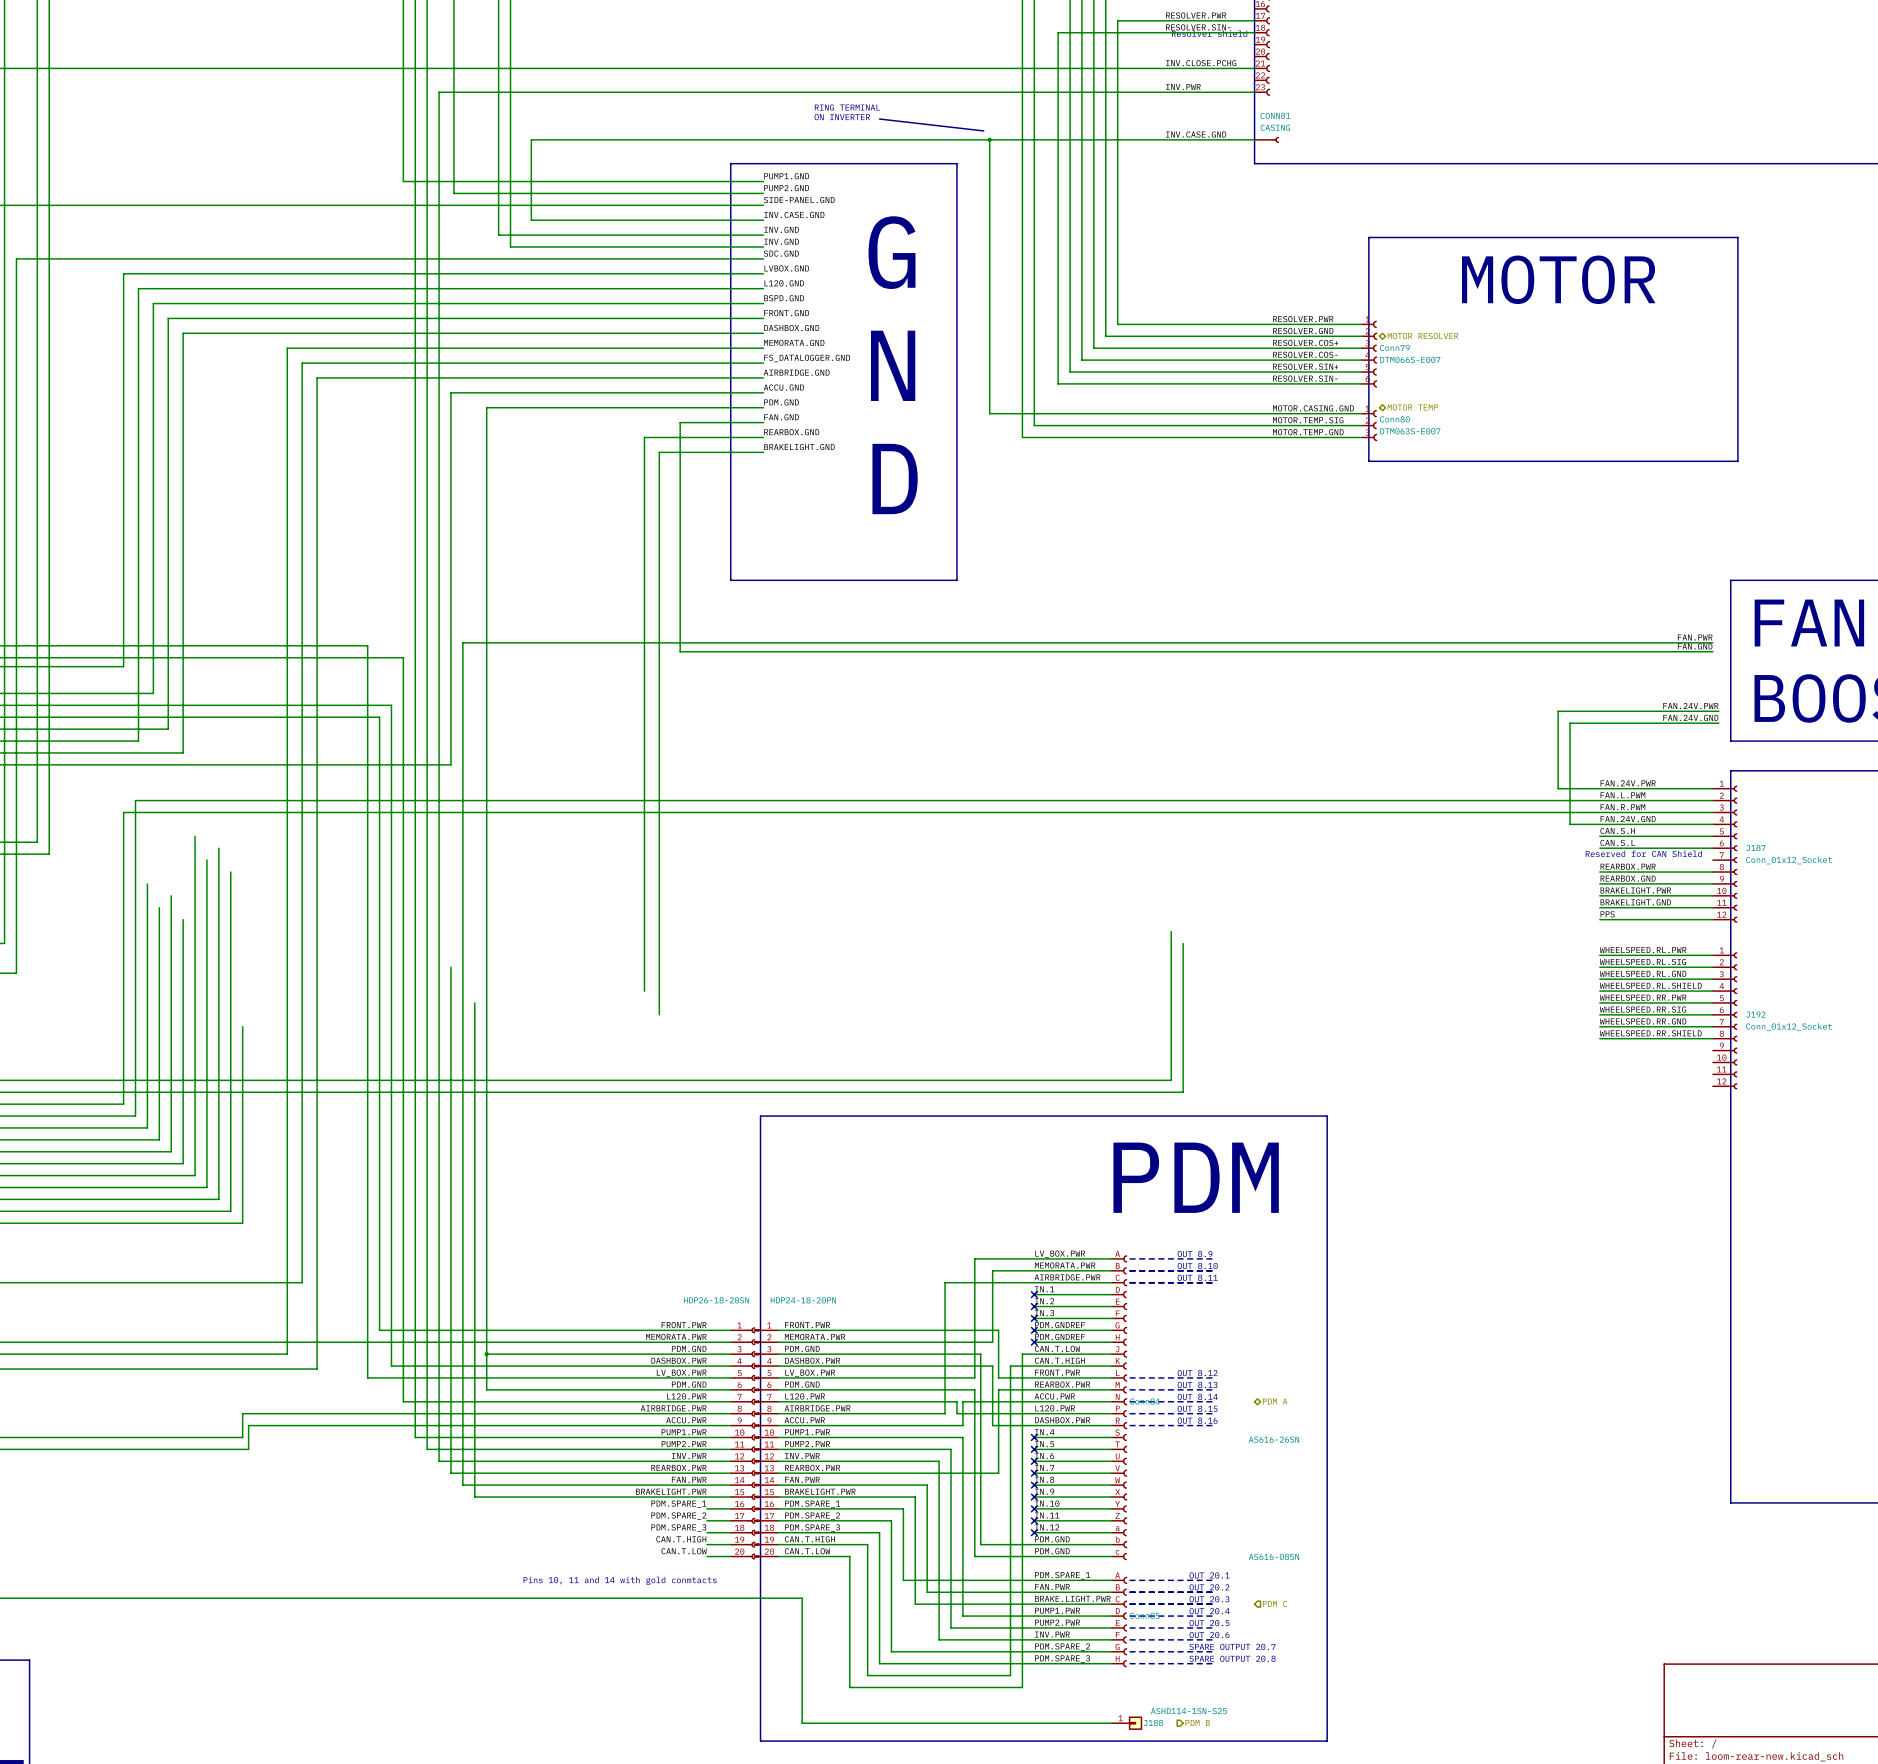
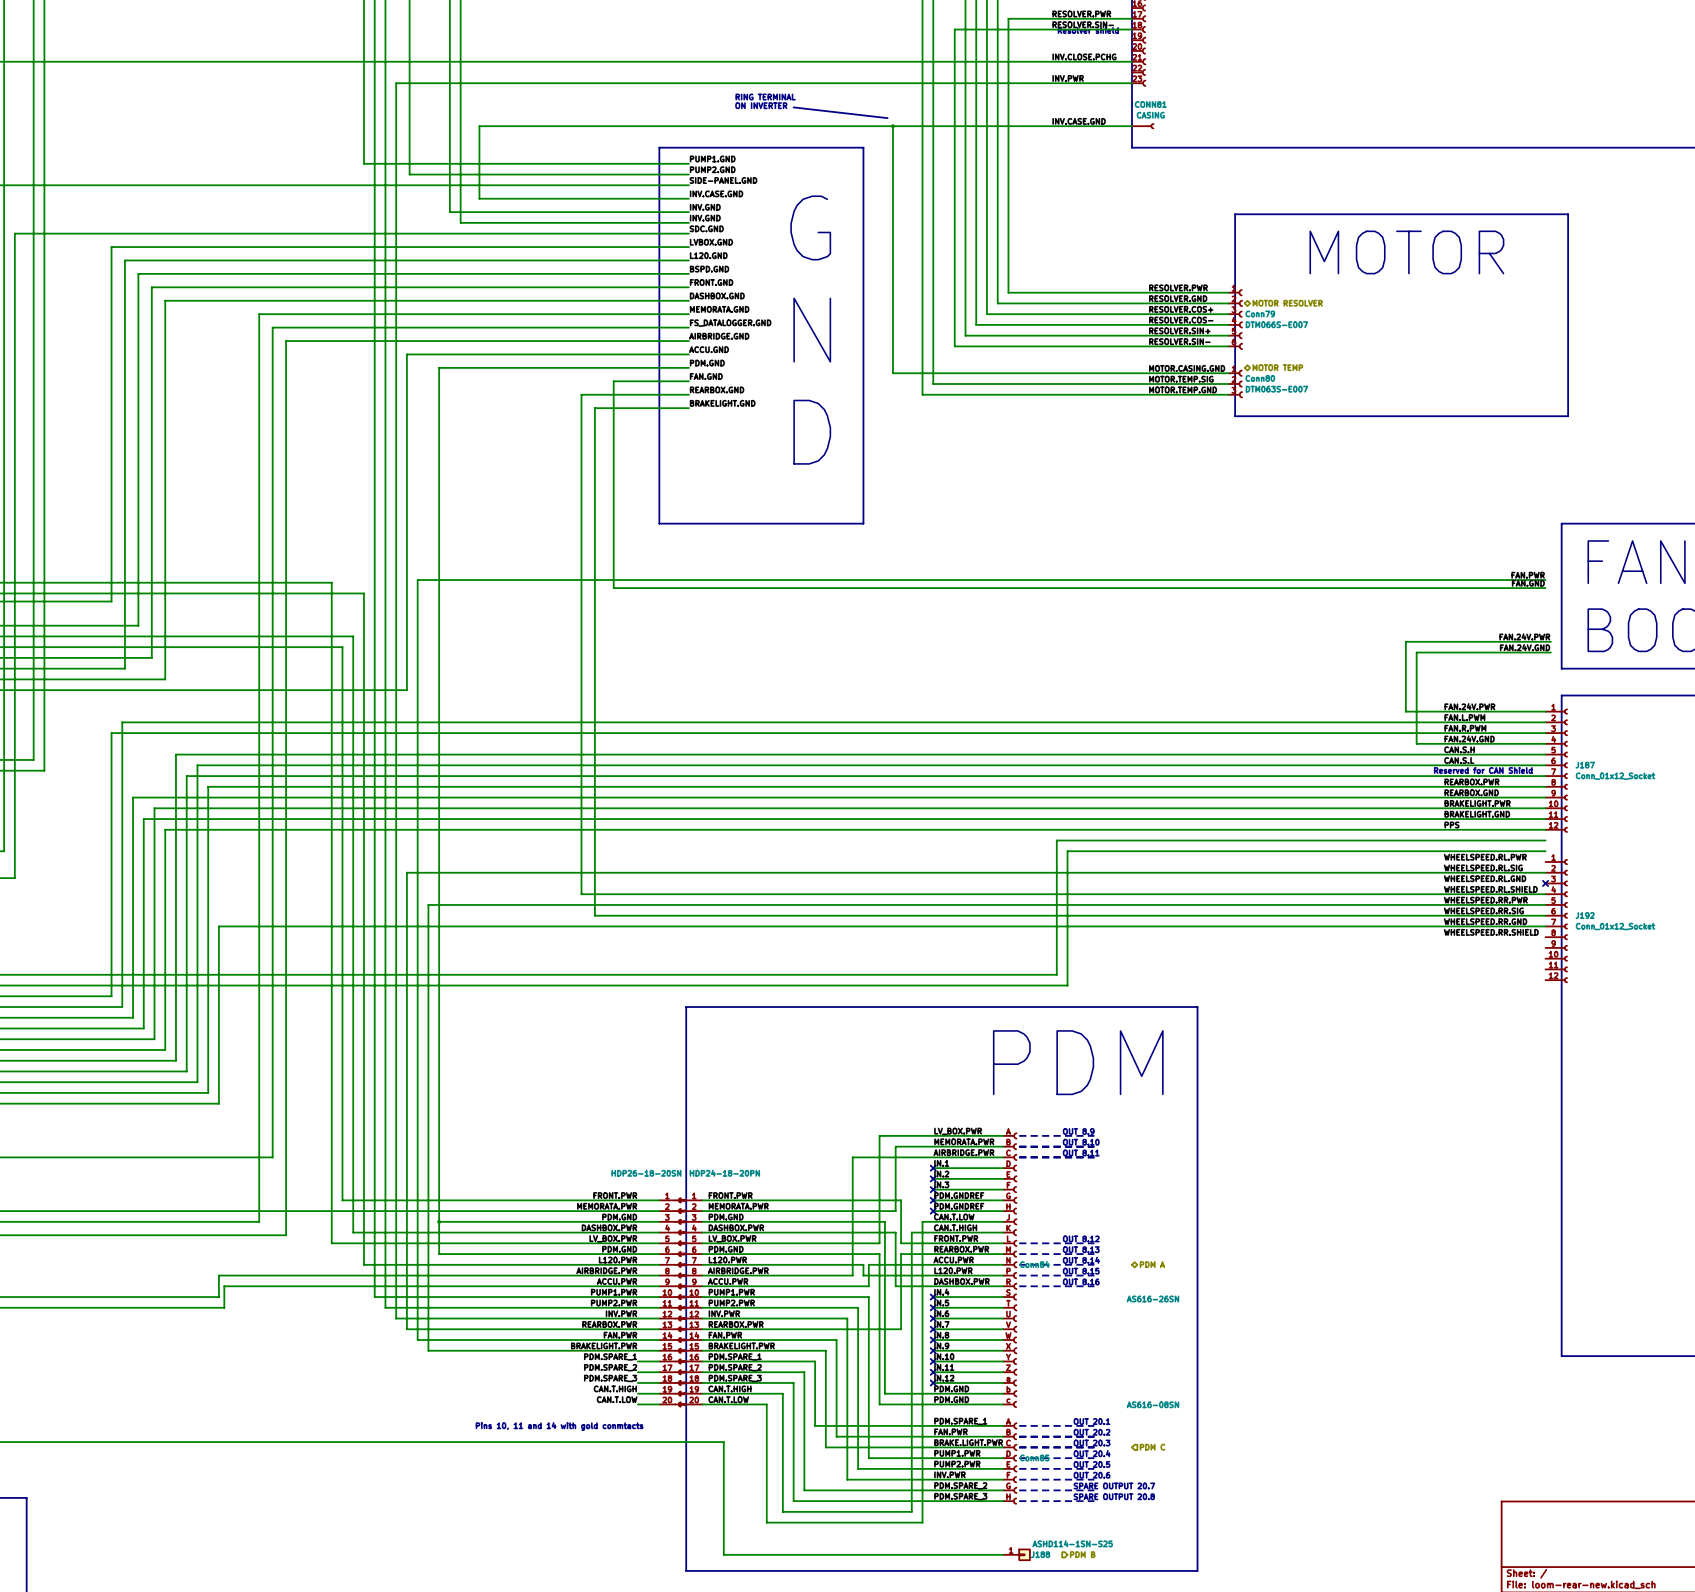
wire: none -> (175, 754) (1443, 754)
wire: none -> (197, 765) (1443, 765)
wire: none -> (186, 776) (1545, 776)
wire: none -> (208, 786) (1443, 786)
wire: none -> (133, 797) (1443, 797)
wire: none -> (154, 808) (1443, 808)
wire: none -> (143, 819) (1443, 819)
wire: none -> (165, 829) (1443, 829)
wire: none -> (1056, 840) (1545, 840)
wire: none -> (1067, 851) (1545, 851)
wire: (1599, 955) (1712, 955) -> none
wire: none -> (406, 872) (1443, 872)
wire: (1599, 979) (1712, 979) -> none
no-connect mark: none -> (1545, 883)
wire: none -> (581, 894) (1443, 894)
wire: none -> (428, 904) (1443, 904)
wire: none -> (594, 915) (1443, 915)
wire: none -> (218, 926) (1443, 926)
wire: (1599, 1038) (1712, 1038) -> none

